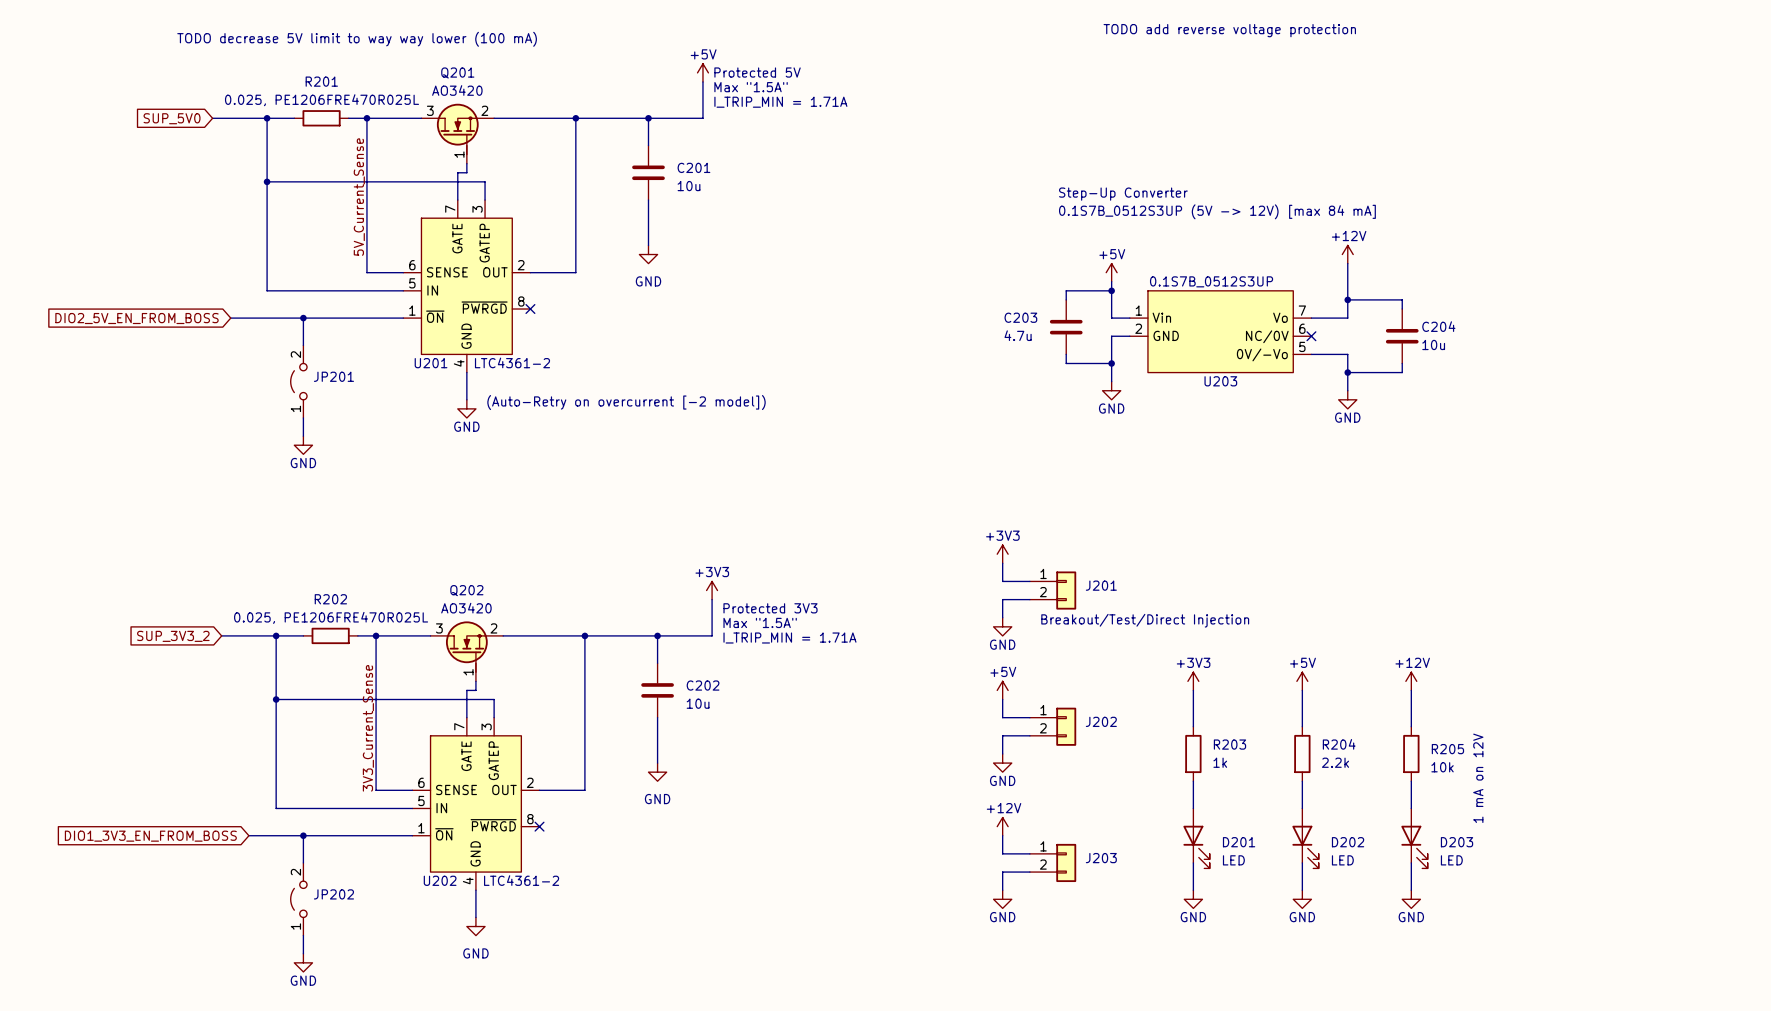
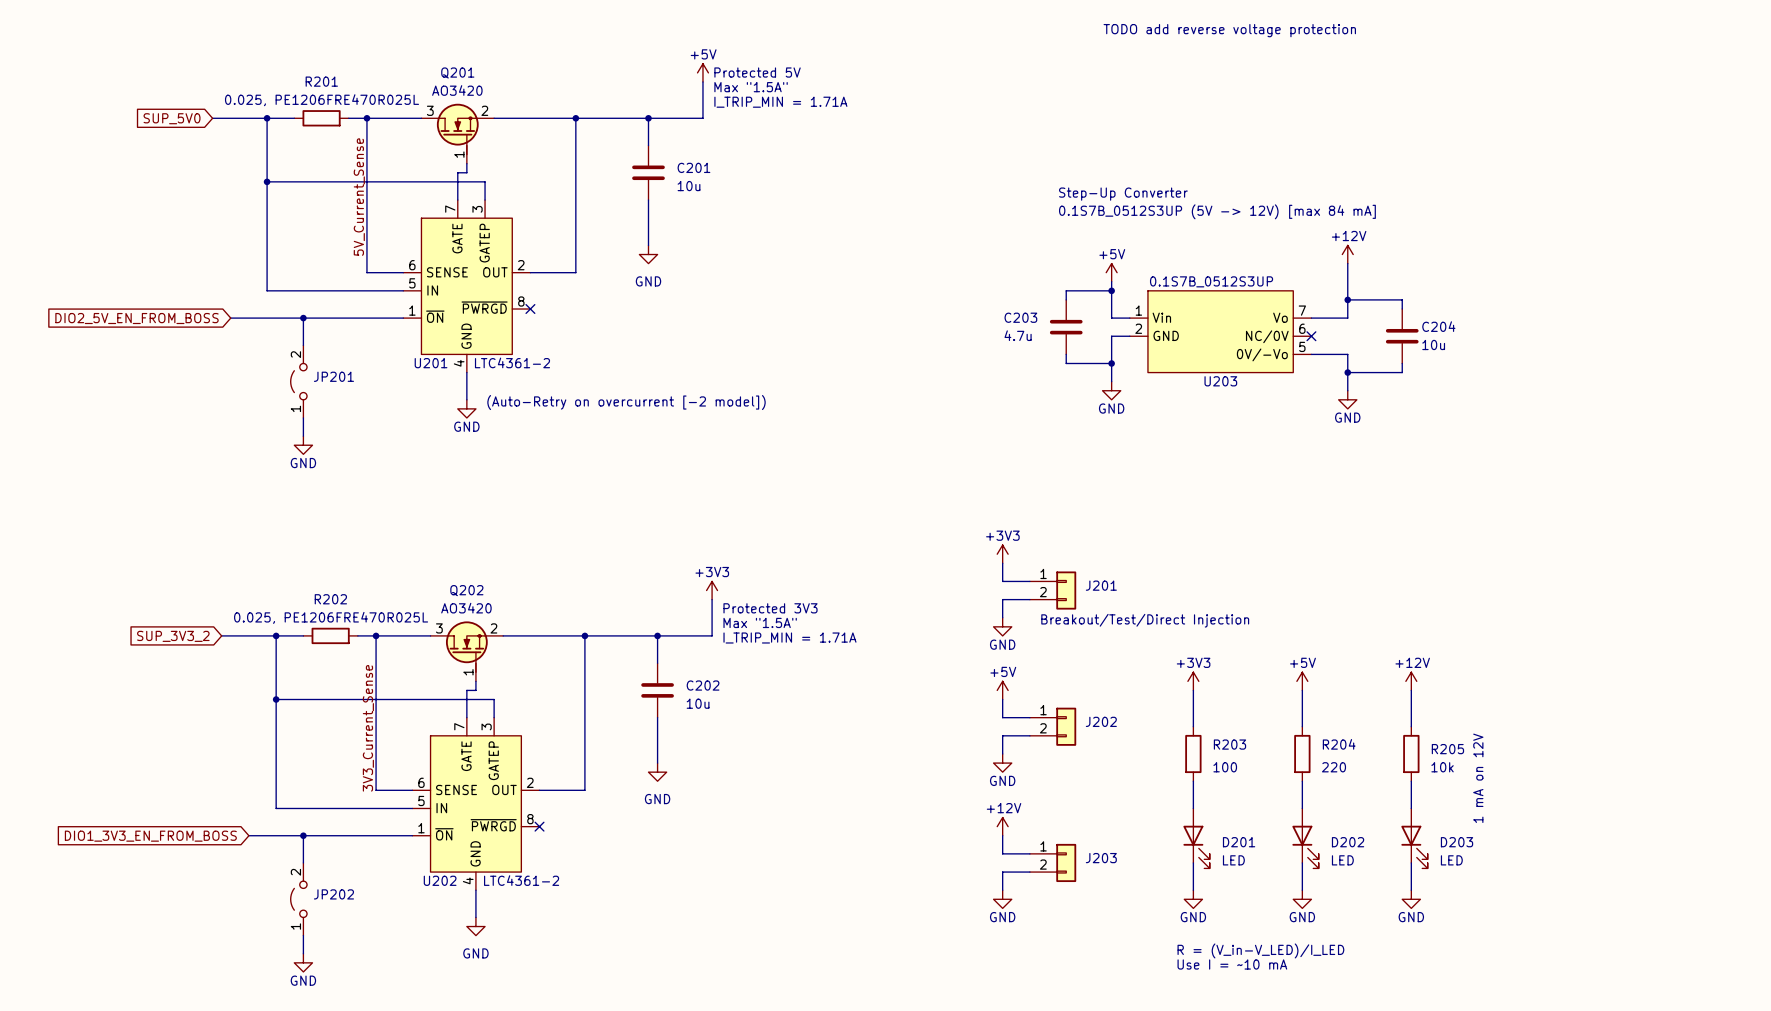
text: TODO decrease 5V limit to way way lower (100 mA) (357, 39) -> none
R203 value: 1k (1220, 762) -> 100 (1225, 767)
R204 value: 2.2k (1335, 762) -> 220 (1333, 767)
text: none -> R = (V_in-V_LED)/I_LED (1260, 950)
text: none -> Use I = ~10 mA (1232, 964)

